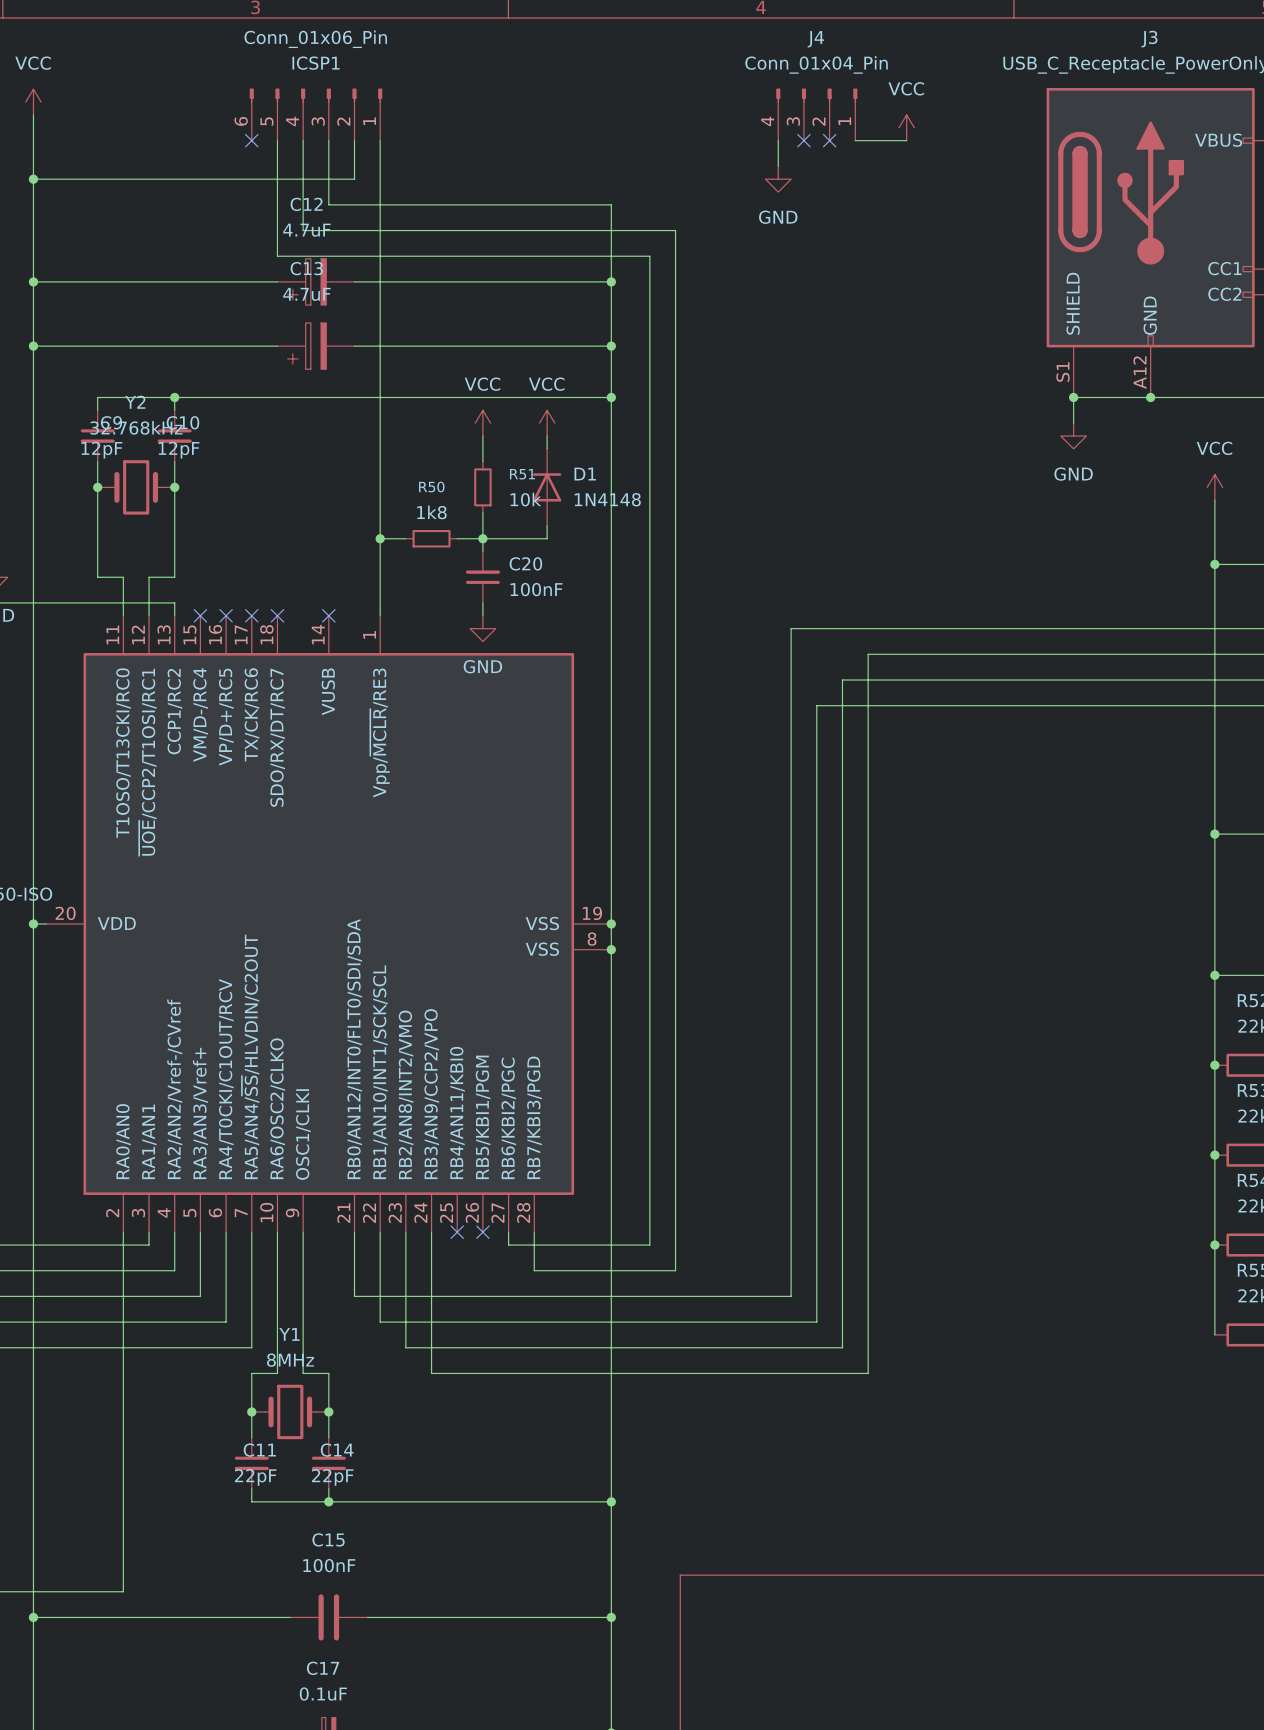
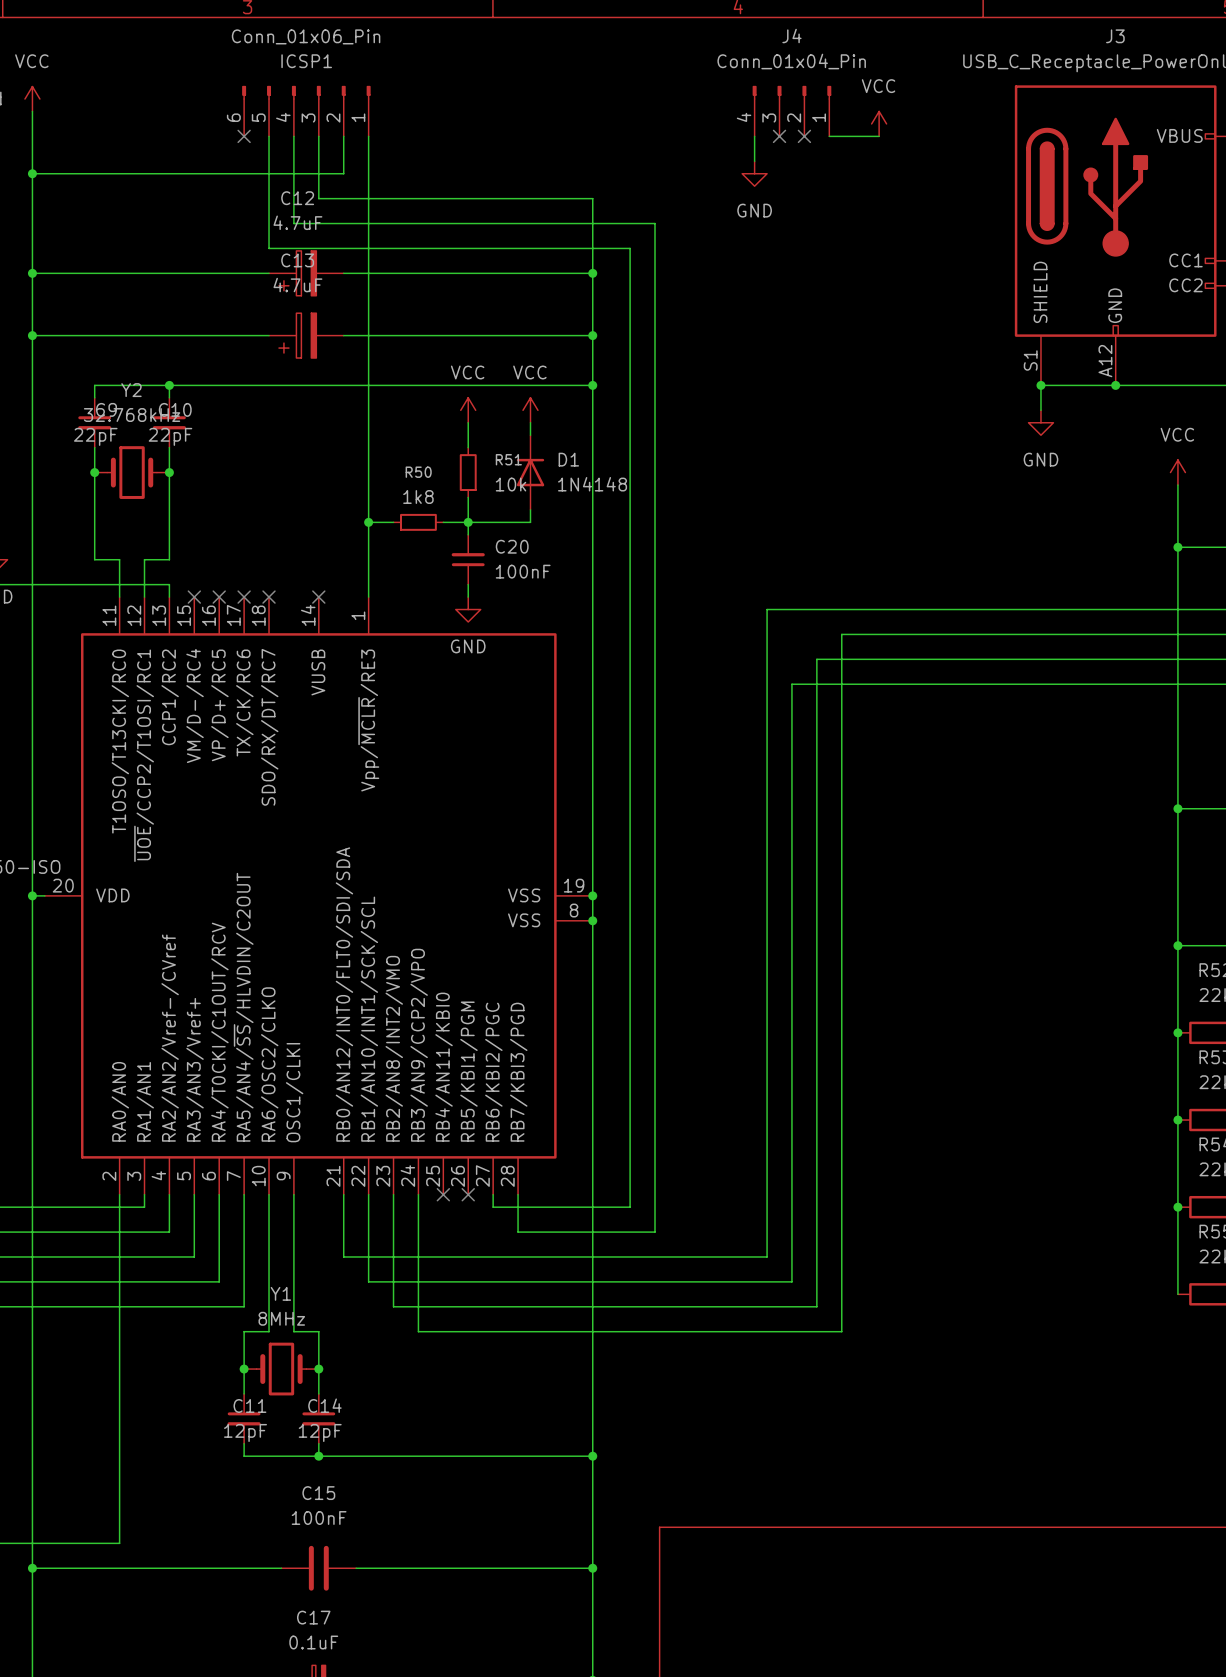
C9 value: 12pF (101, 450) -> 22pF (95, 436)
C10 value: 12pF (178, 450) -> 22pF (170, 436)
C11 value: 22pF (255, 1477) -> 12pF (245, 1432)
C14 value: 22pF (332, 1477) -> 12pF (320, 1432)

